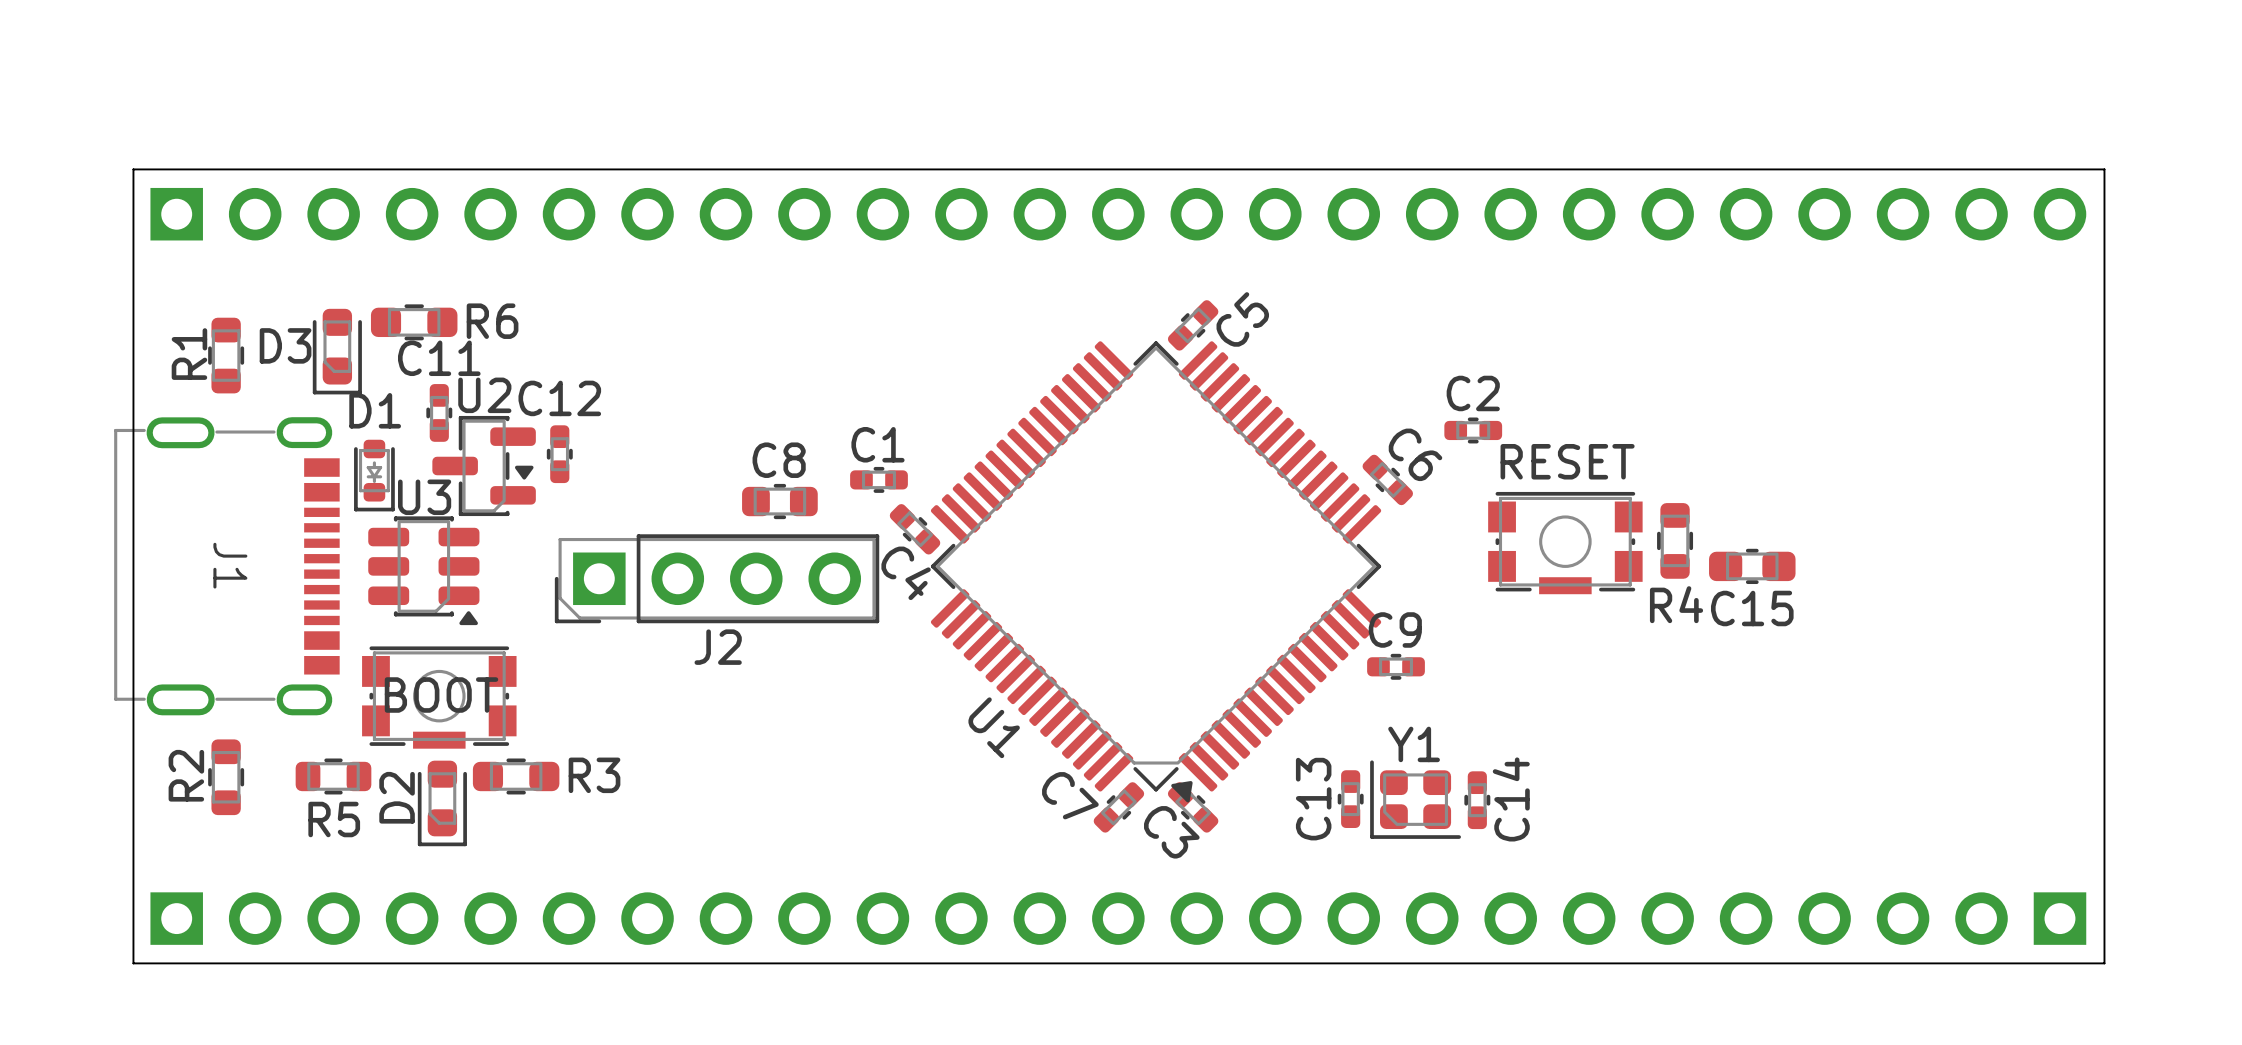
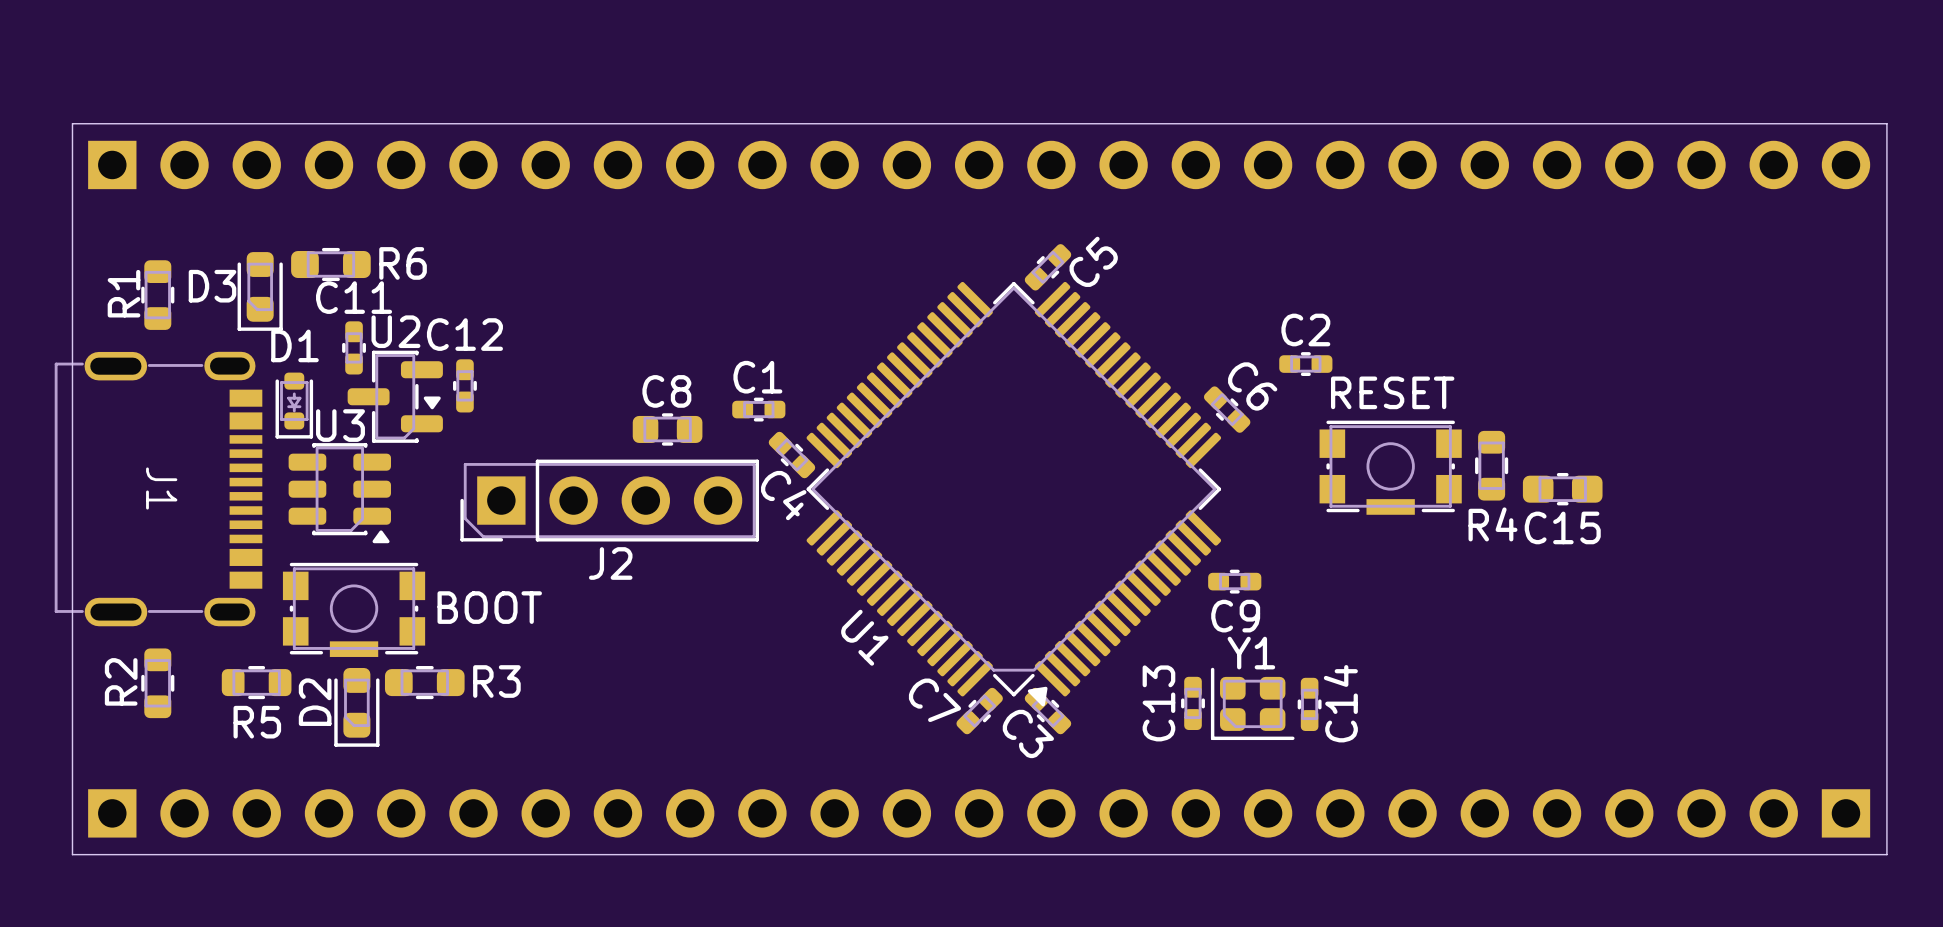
C9 name position: C9 (1395, 629) -> C9 (1235, 616)
part value position: BOOT (441, 695) -> BOOT (489, 607)

